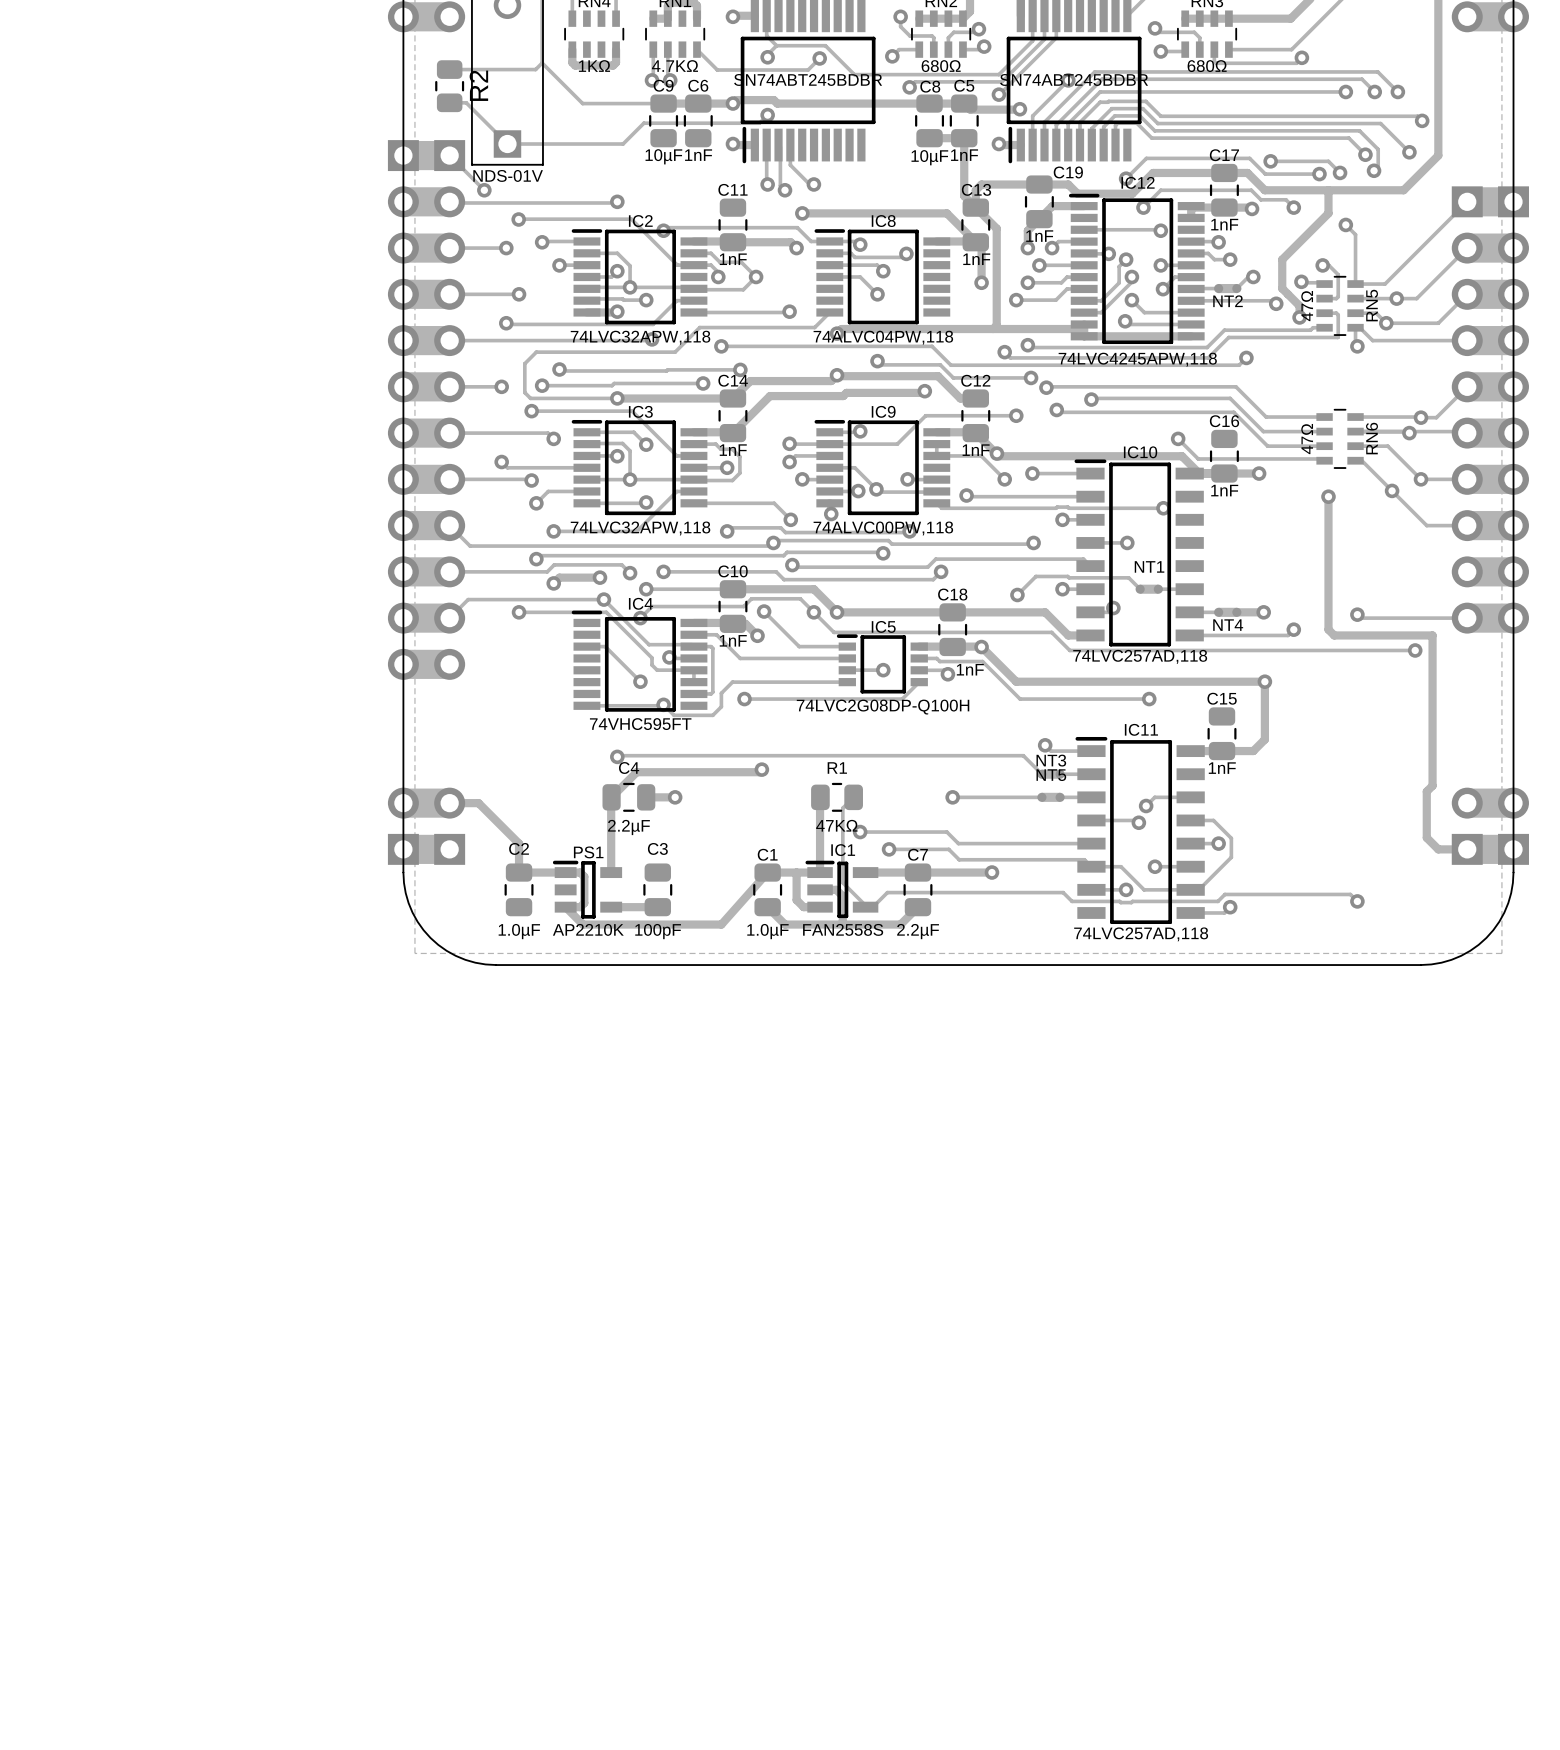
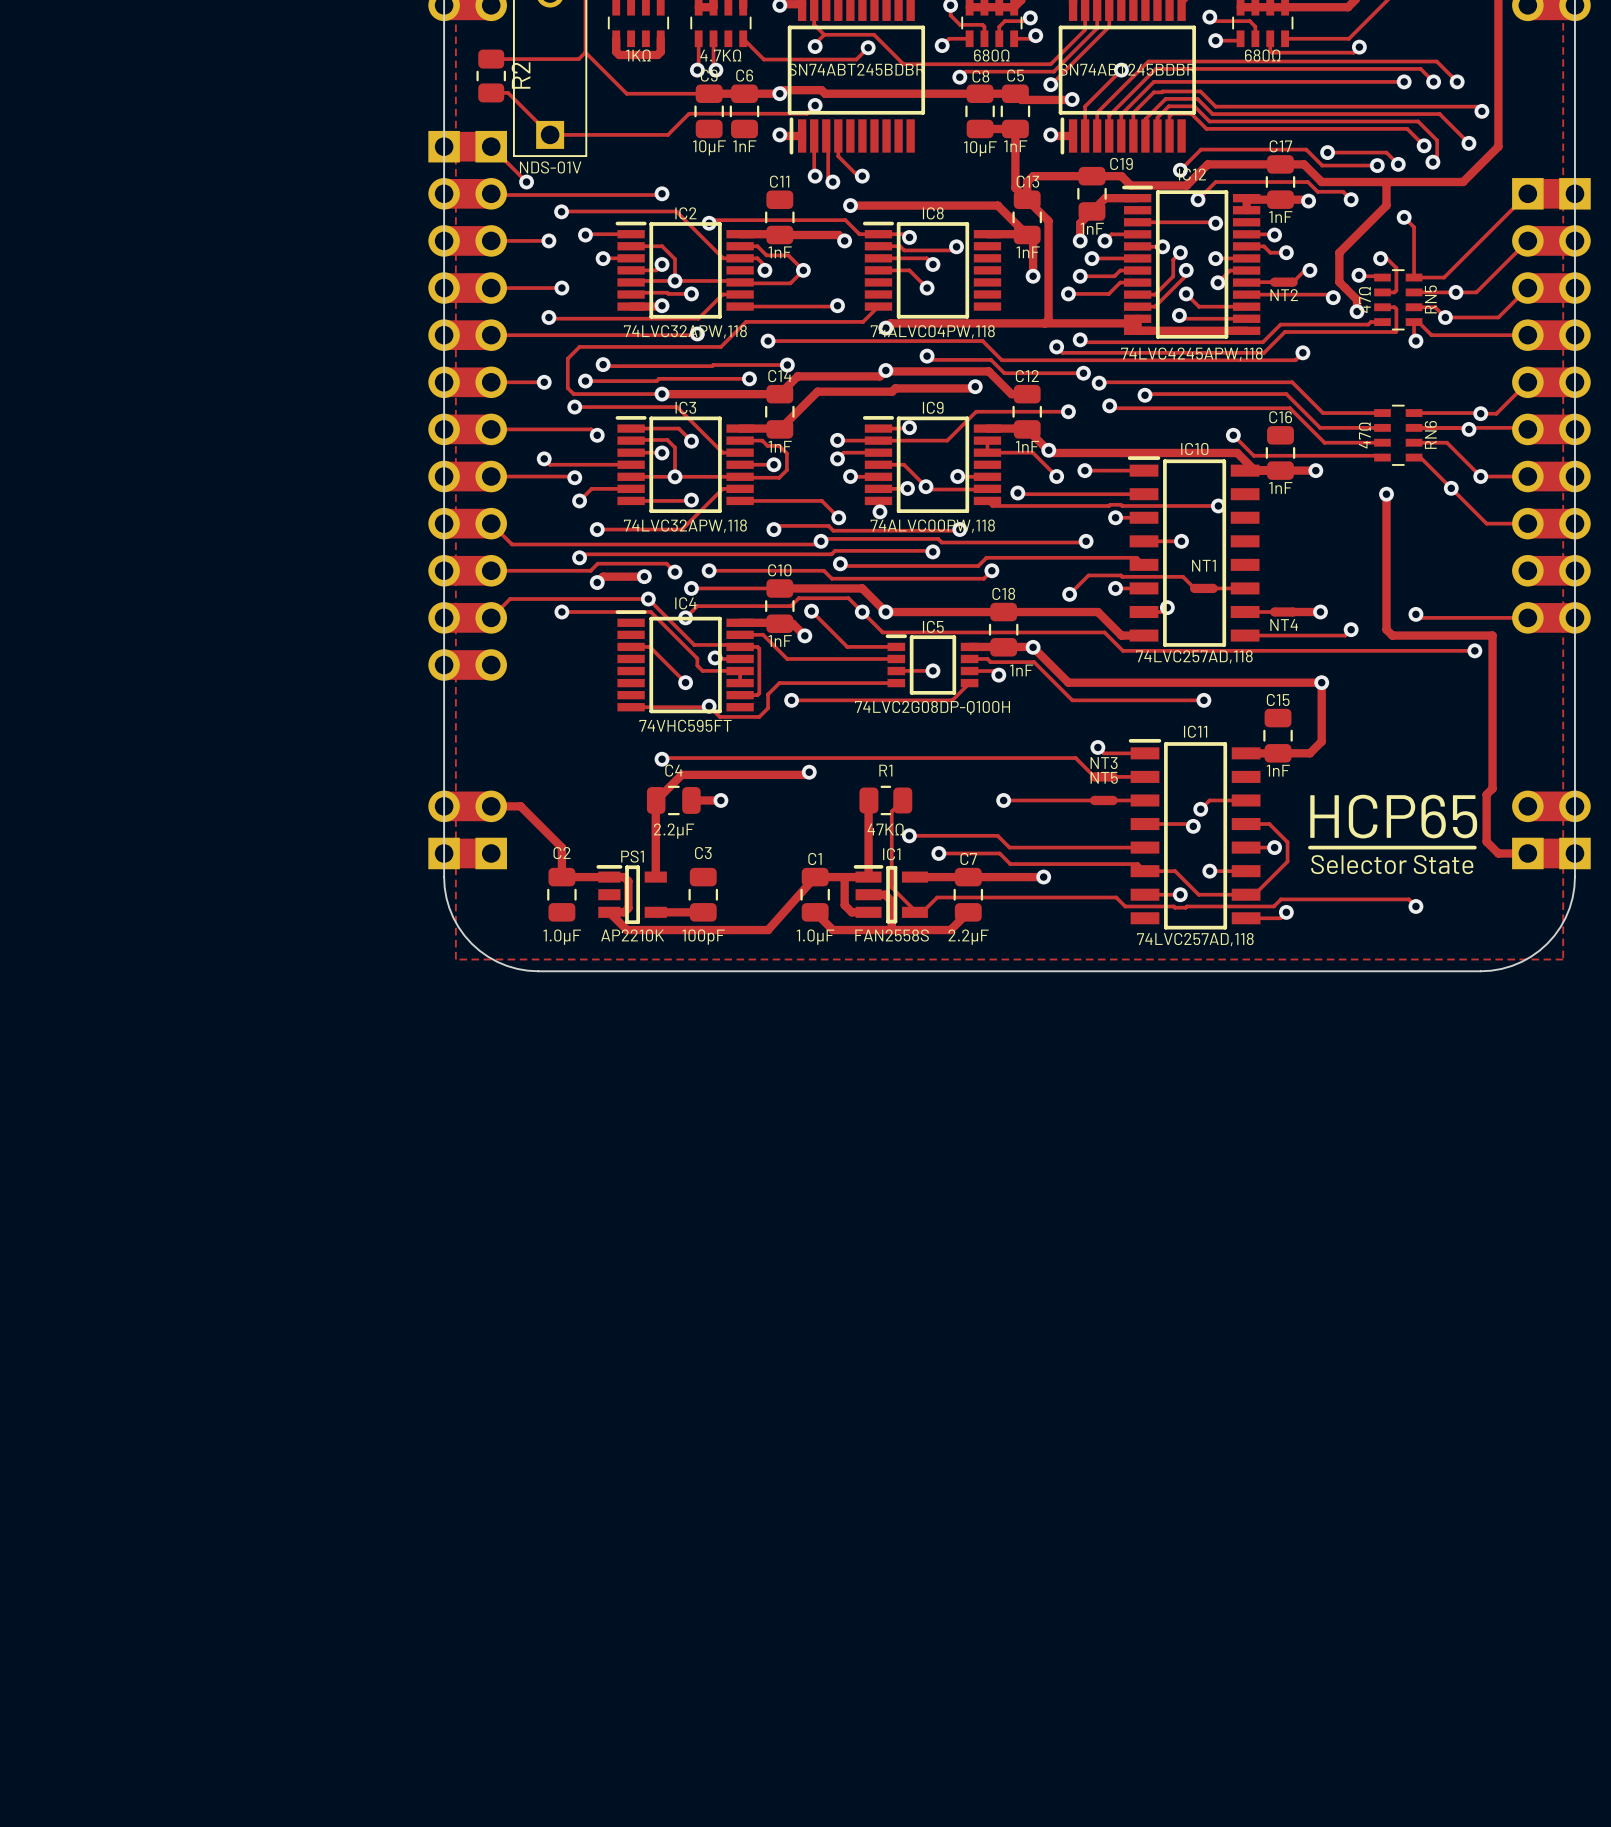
text: none -> HCP65 (1393, 816)
line: none -> (1309, 847) (1474, 847)
text: none -> Selector State (1392, 864)

